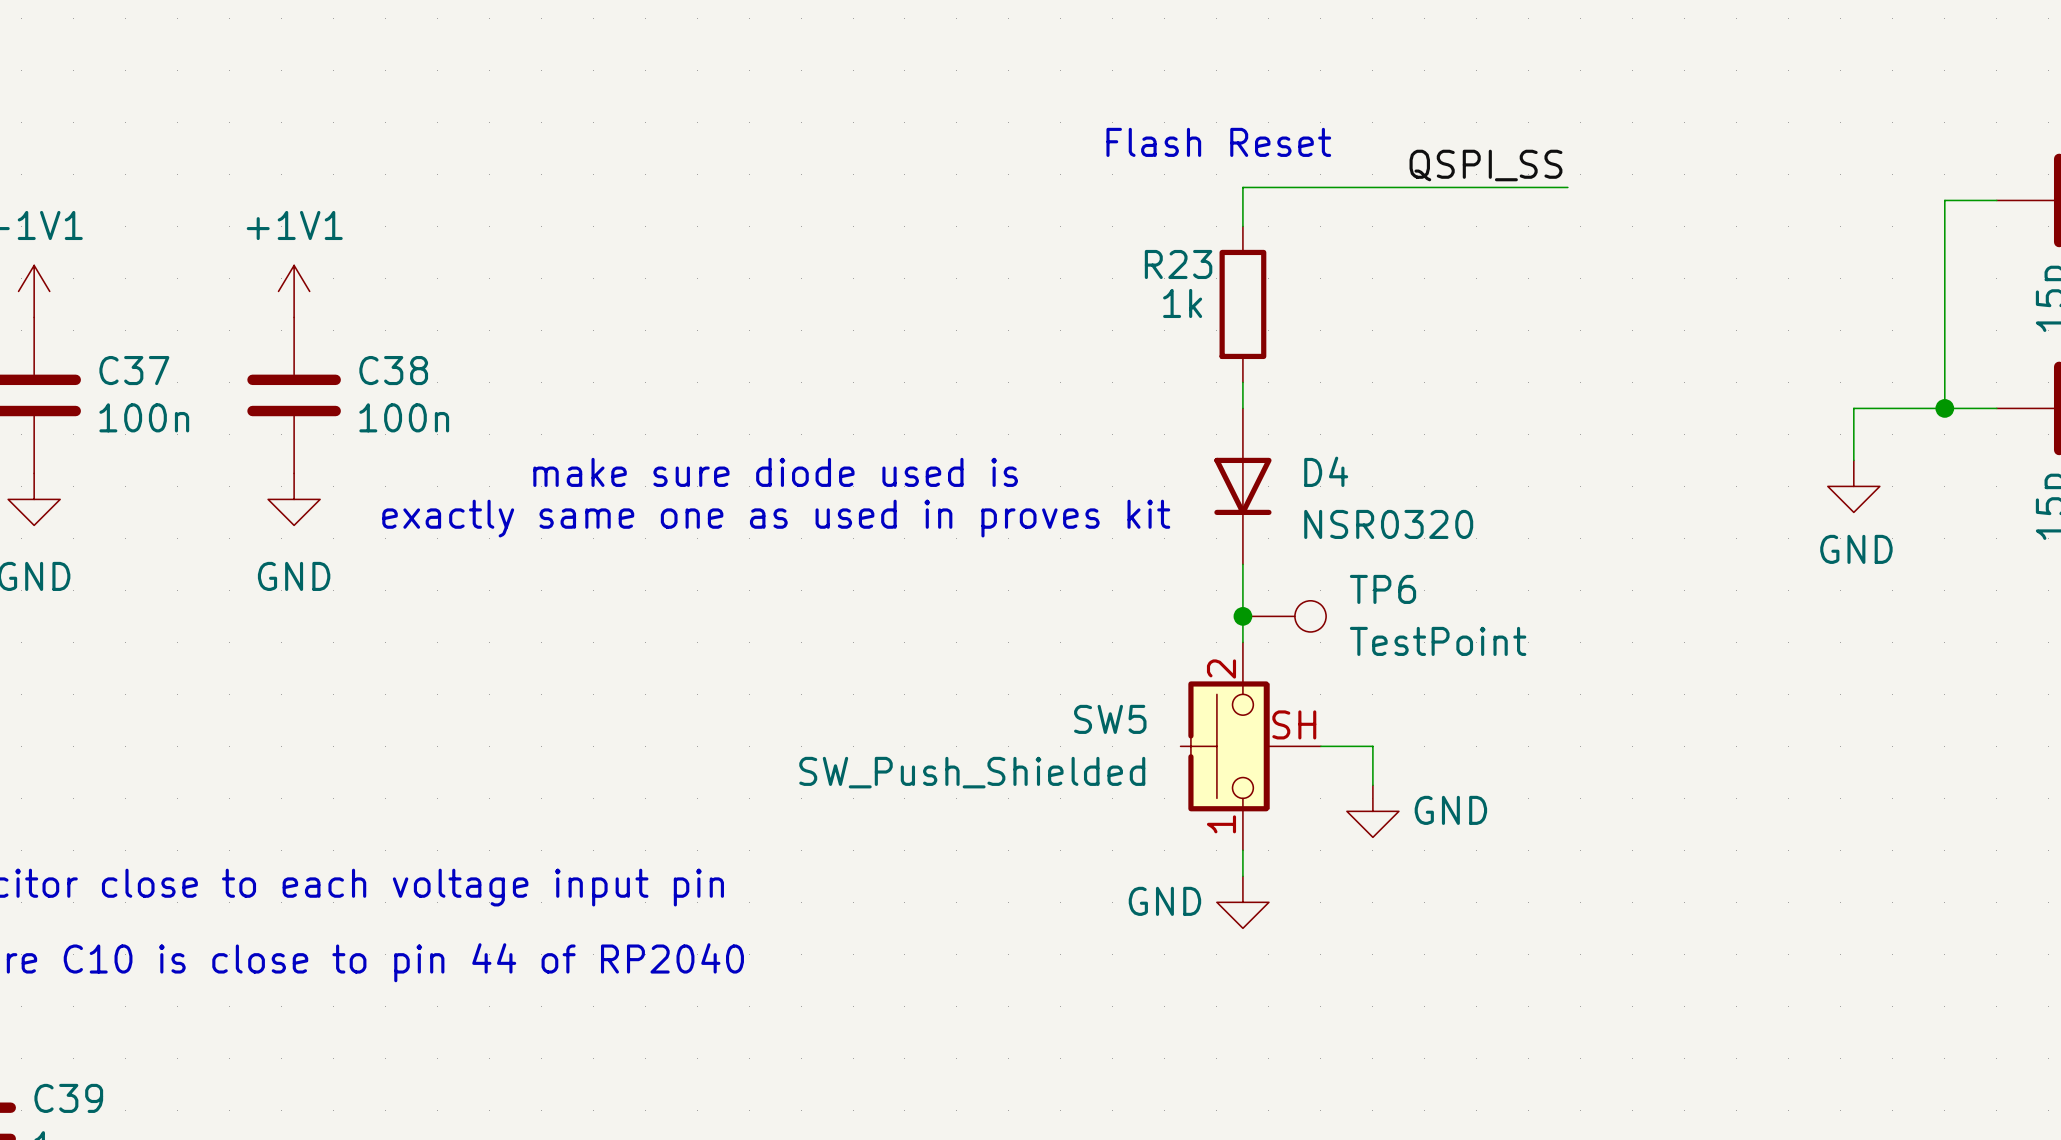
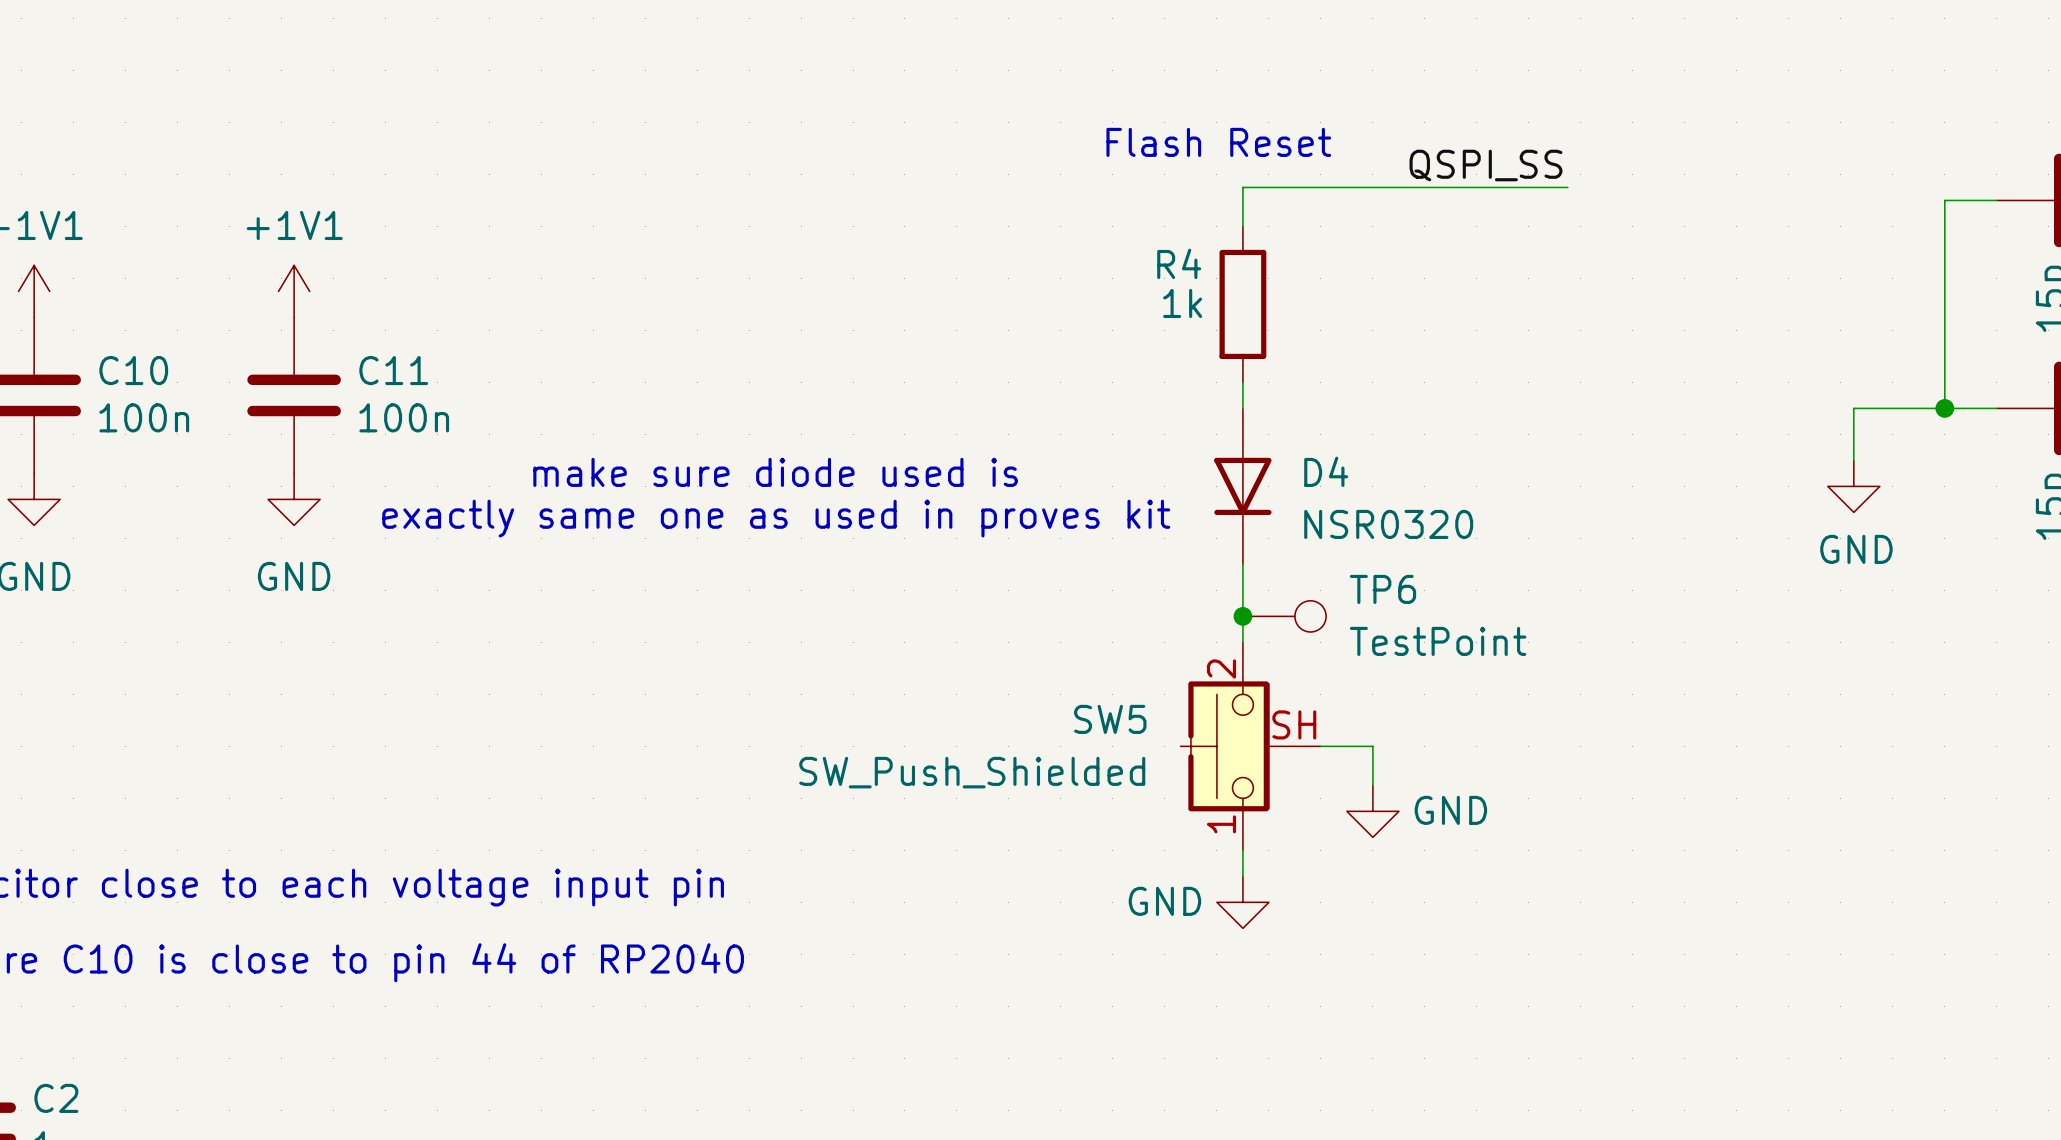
R23 name: R23 (1178, 264) -> R4 (1179, 263)
C37 name: C37 (134, 370) -> C10 (133, 370)
C38 name: C38 (393, 370) -> C11 (393, 370)
C39 name: C39 (68, 1098) -> C2 (56, 1098)

